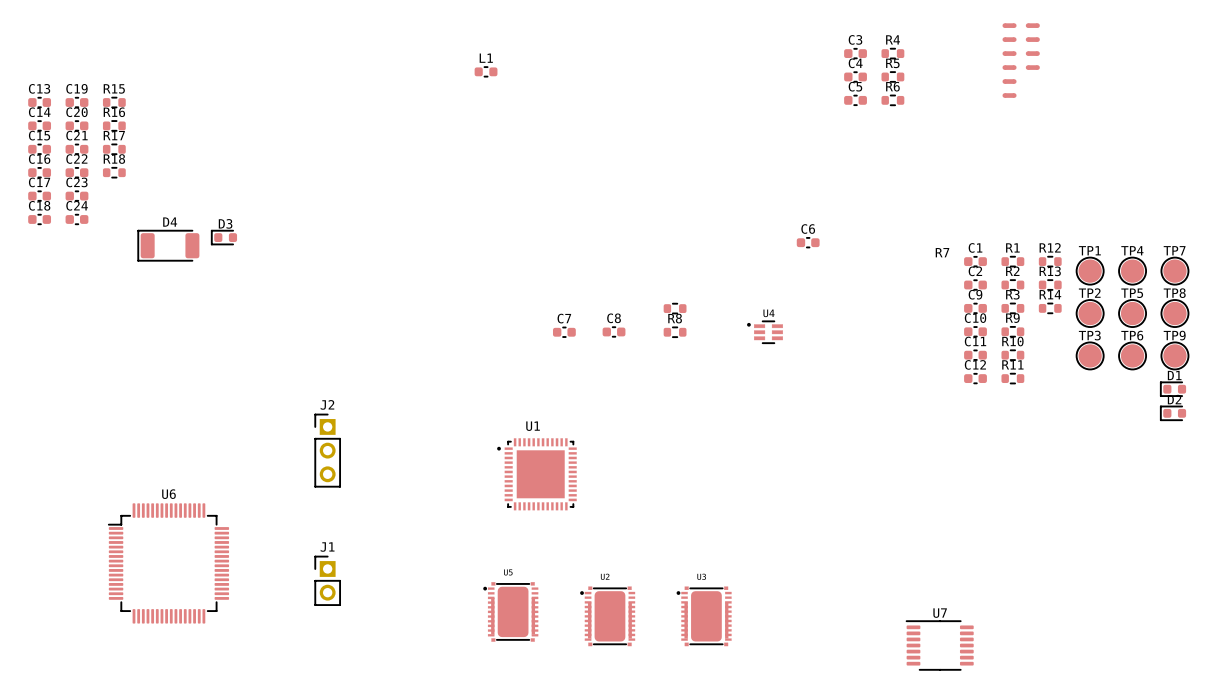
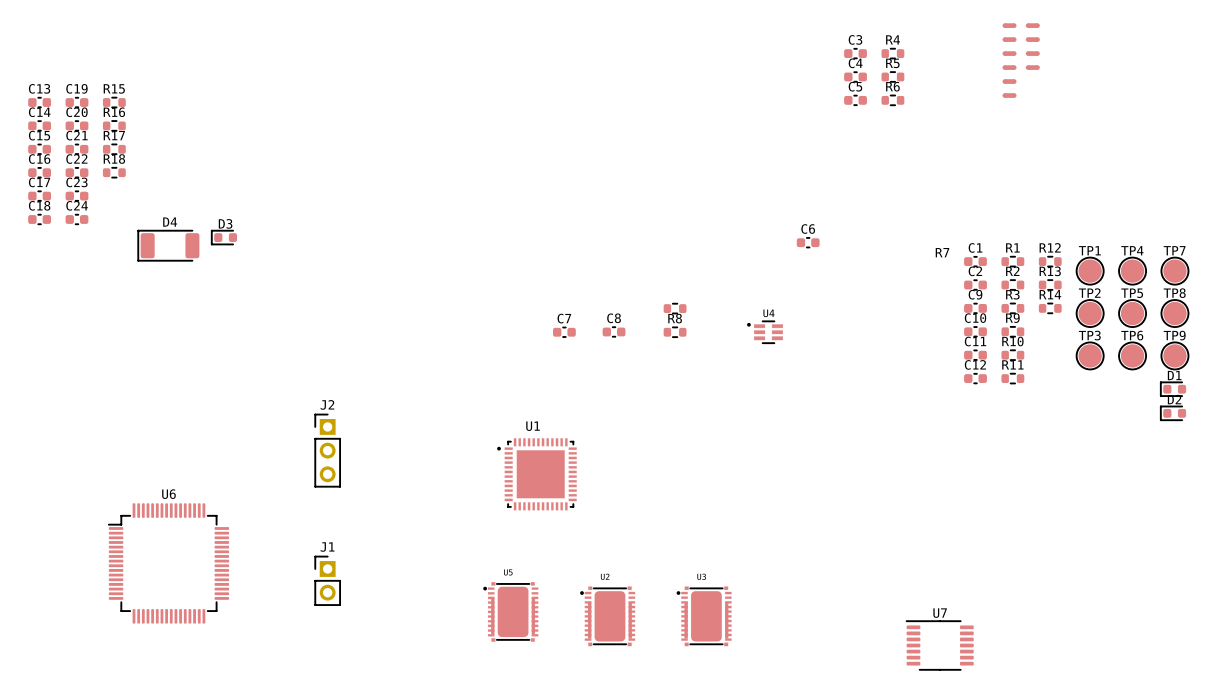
L1: (486, 71) -> none

